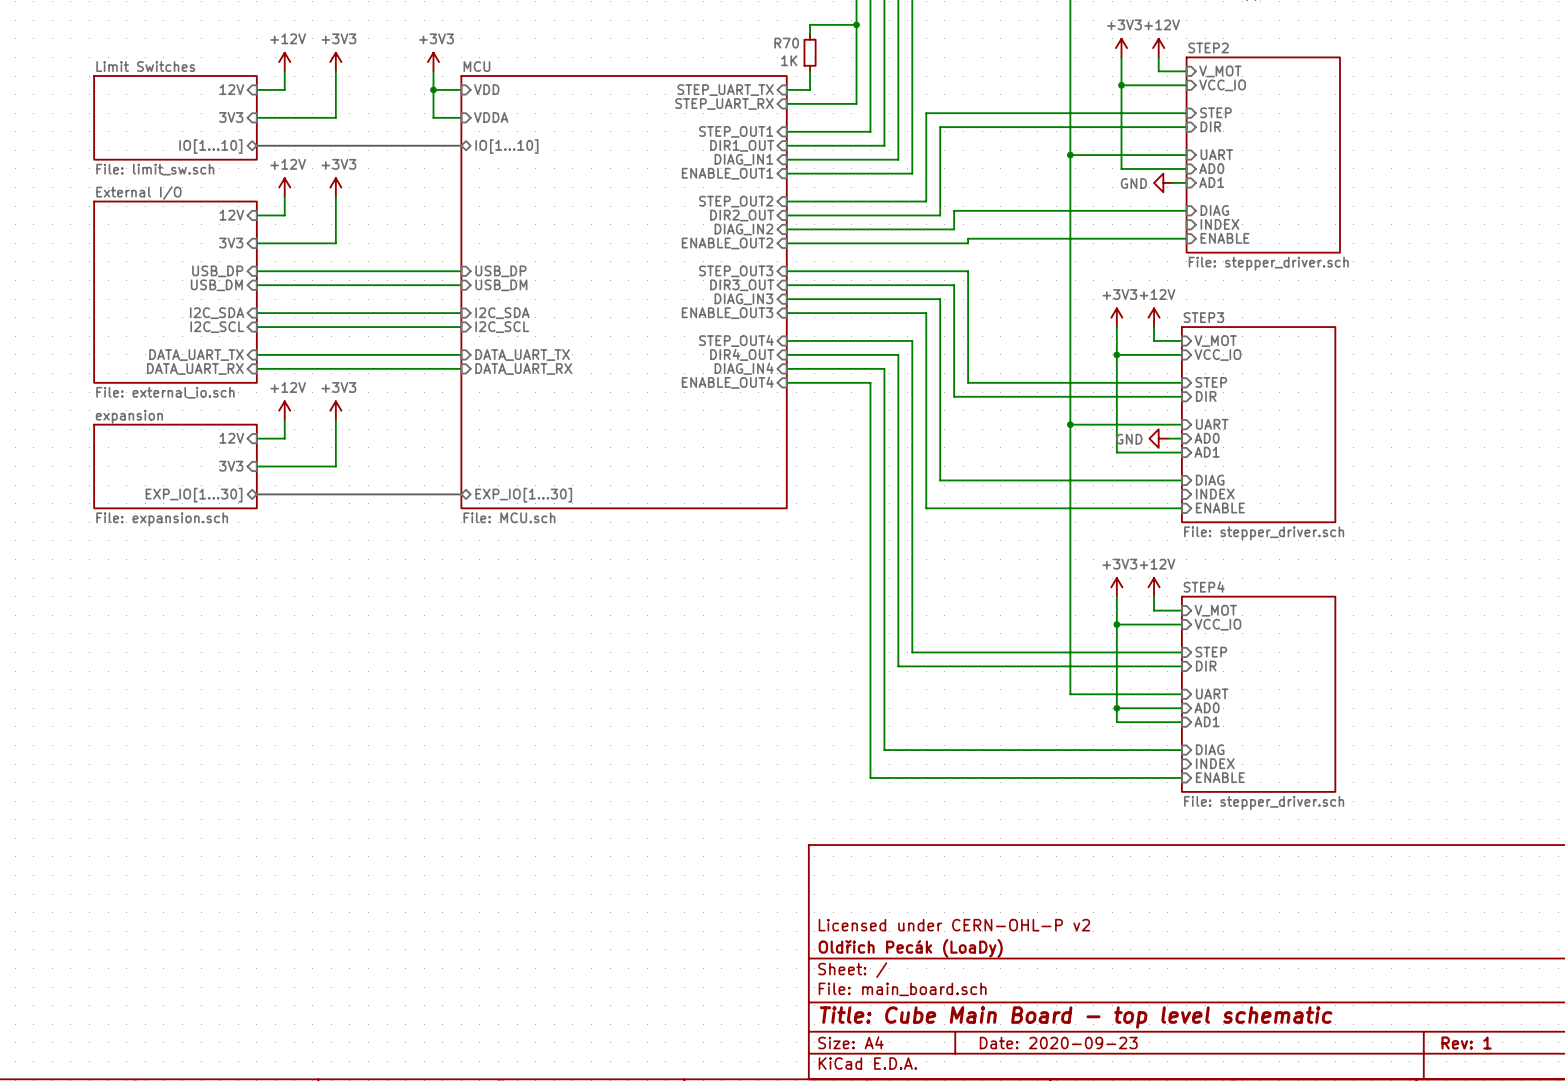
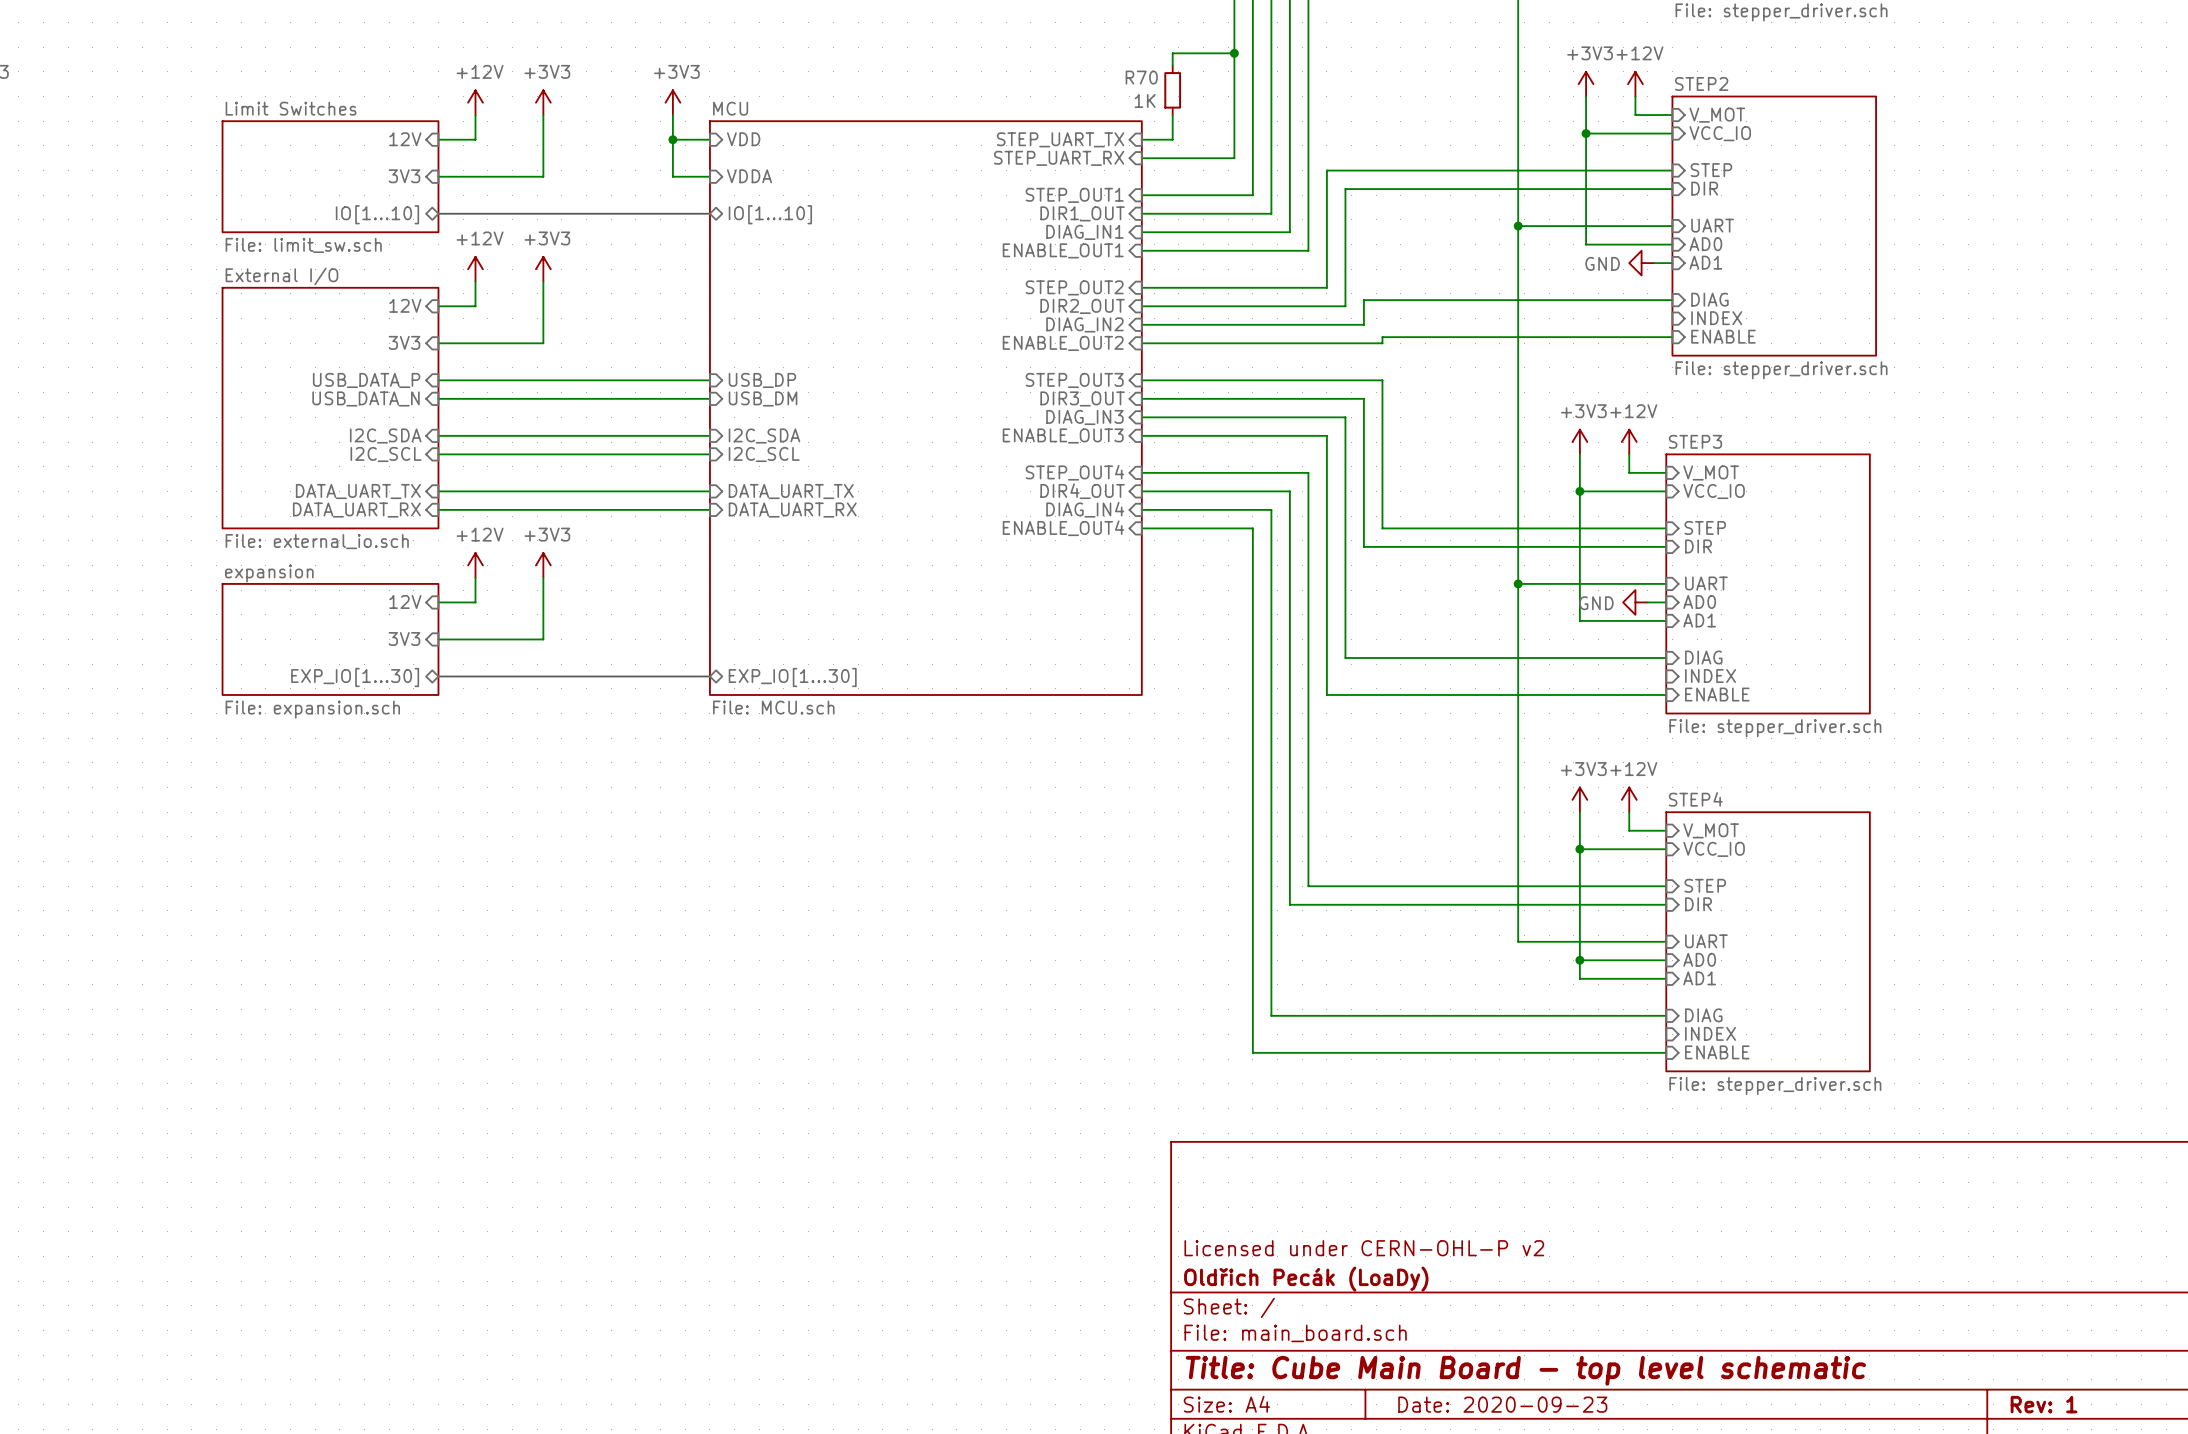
sheet pin: USB_DP (217, 271) -> USB_DATA_P (366, 380)
sheet pin: USB_DM (216, 285) -> USB_DATA_N (366, 398)

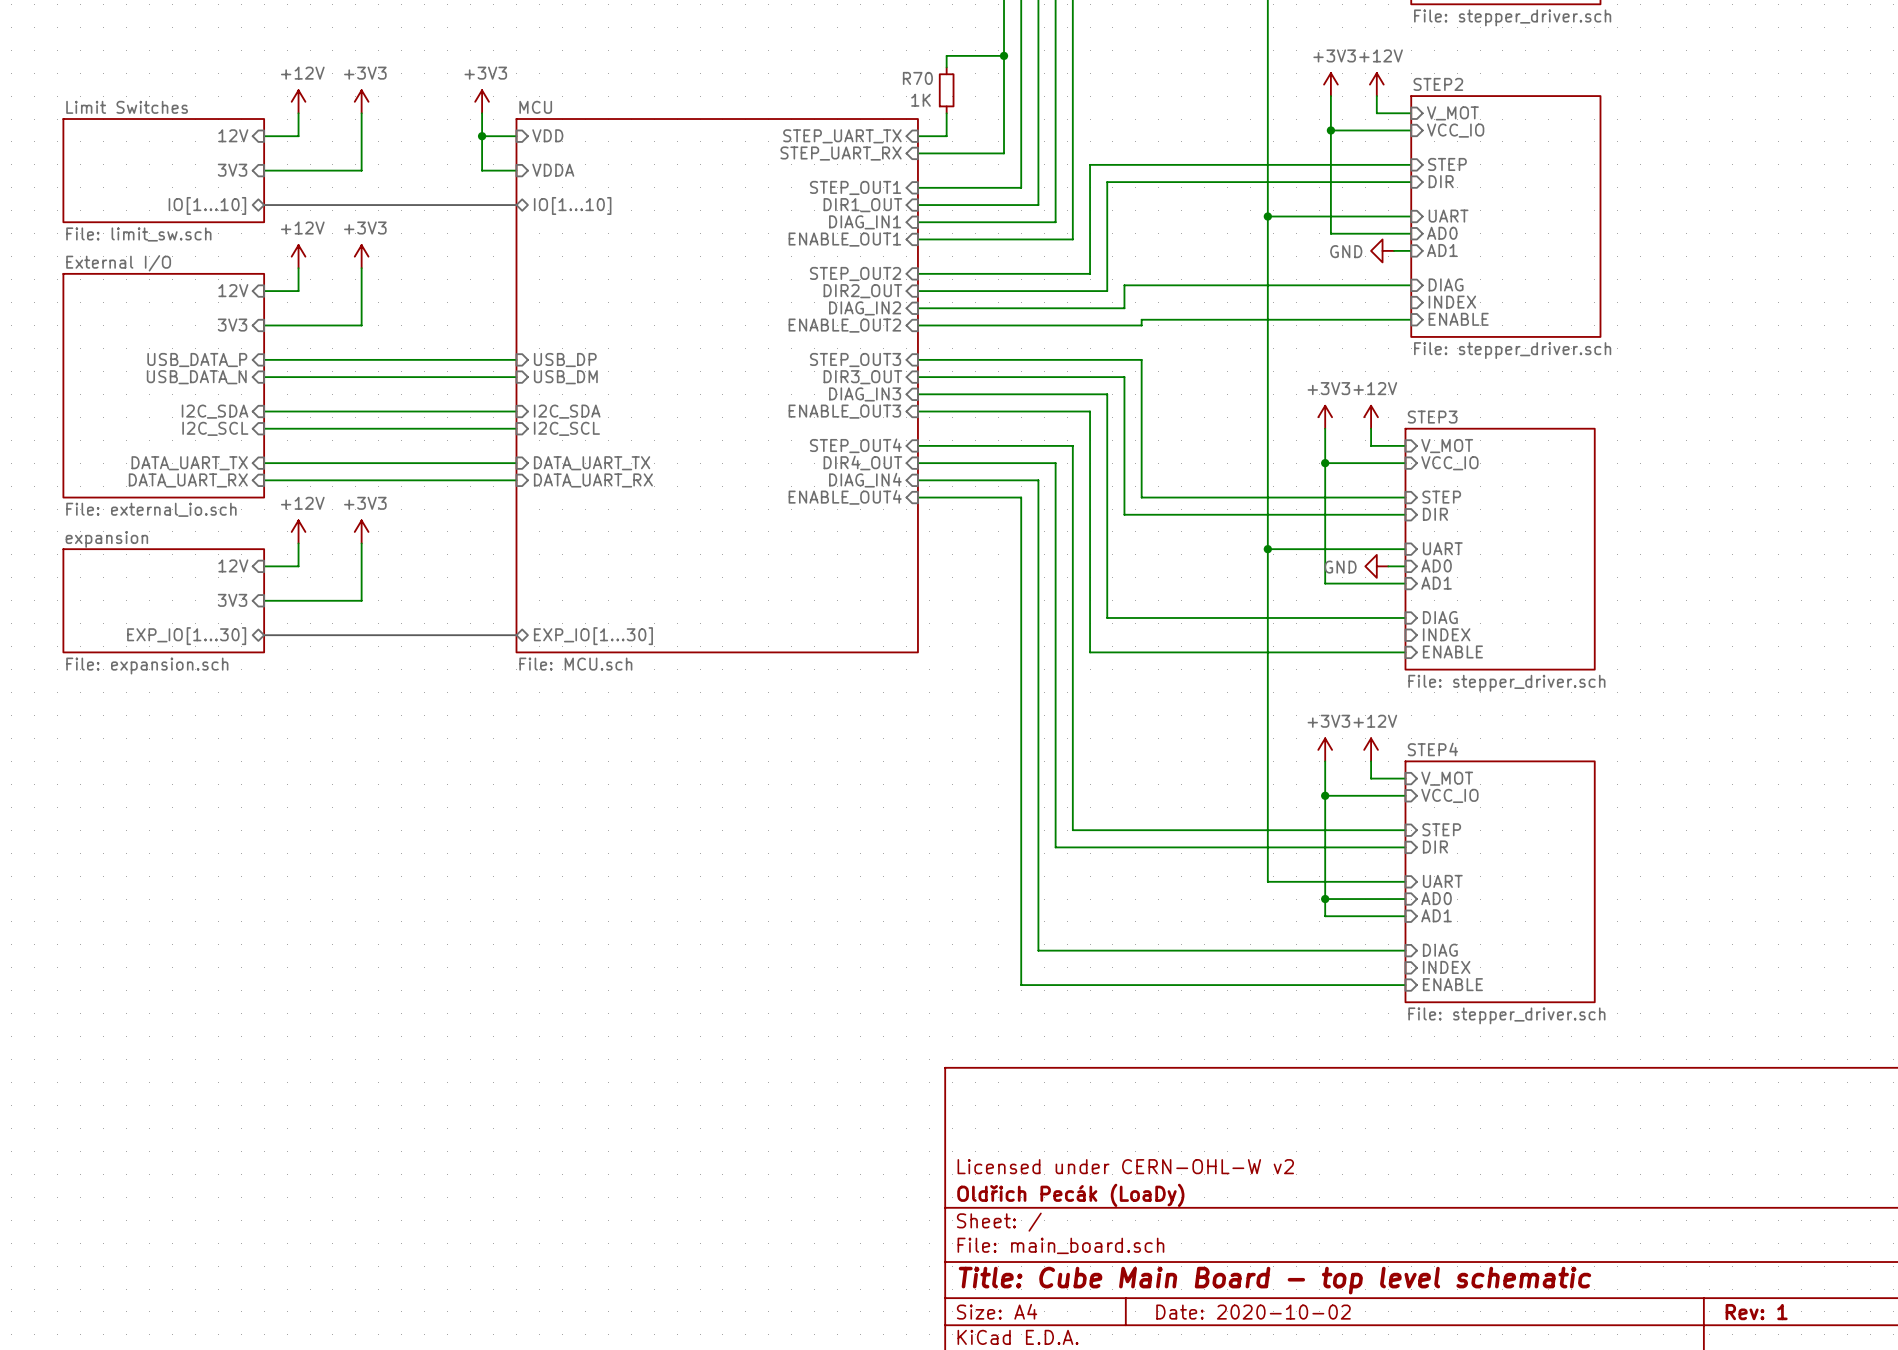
title block: Licensed under CERN-OHL-P v2 (1364, 1248) -> Licensed under CERN-OHL-W v2 (1125, 1166)
title block: Date: 2020-09-23 (1502, 1404) -> Date: 2020-10-02 (1253, 1312)

